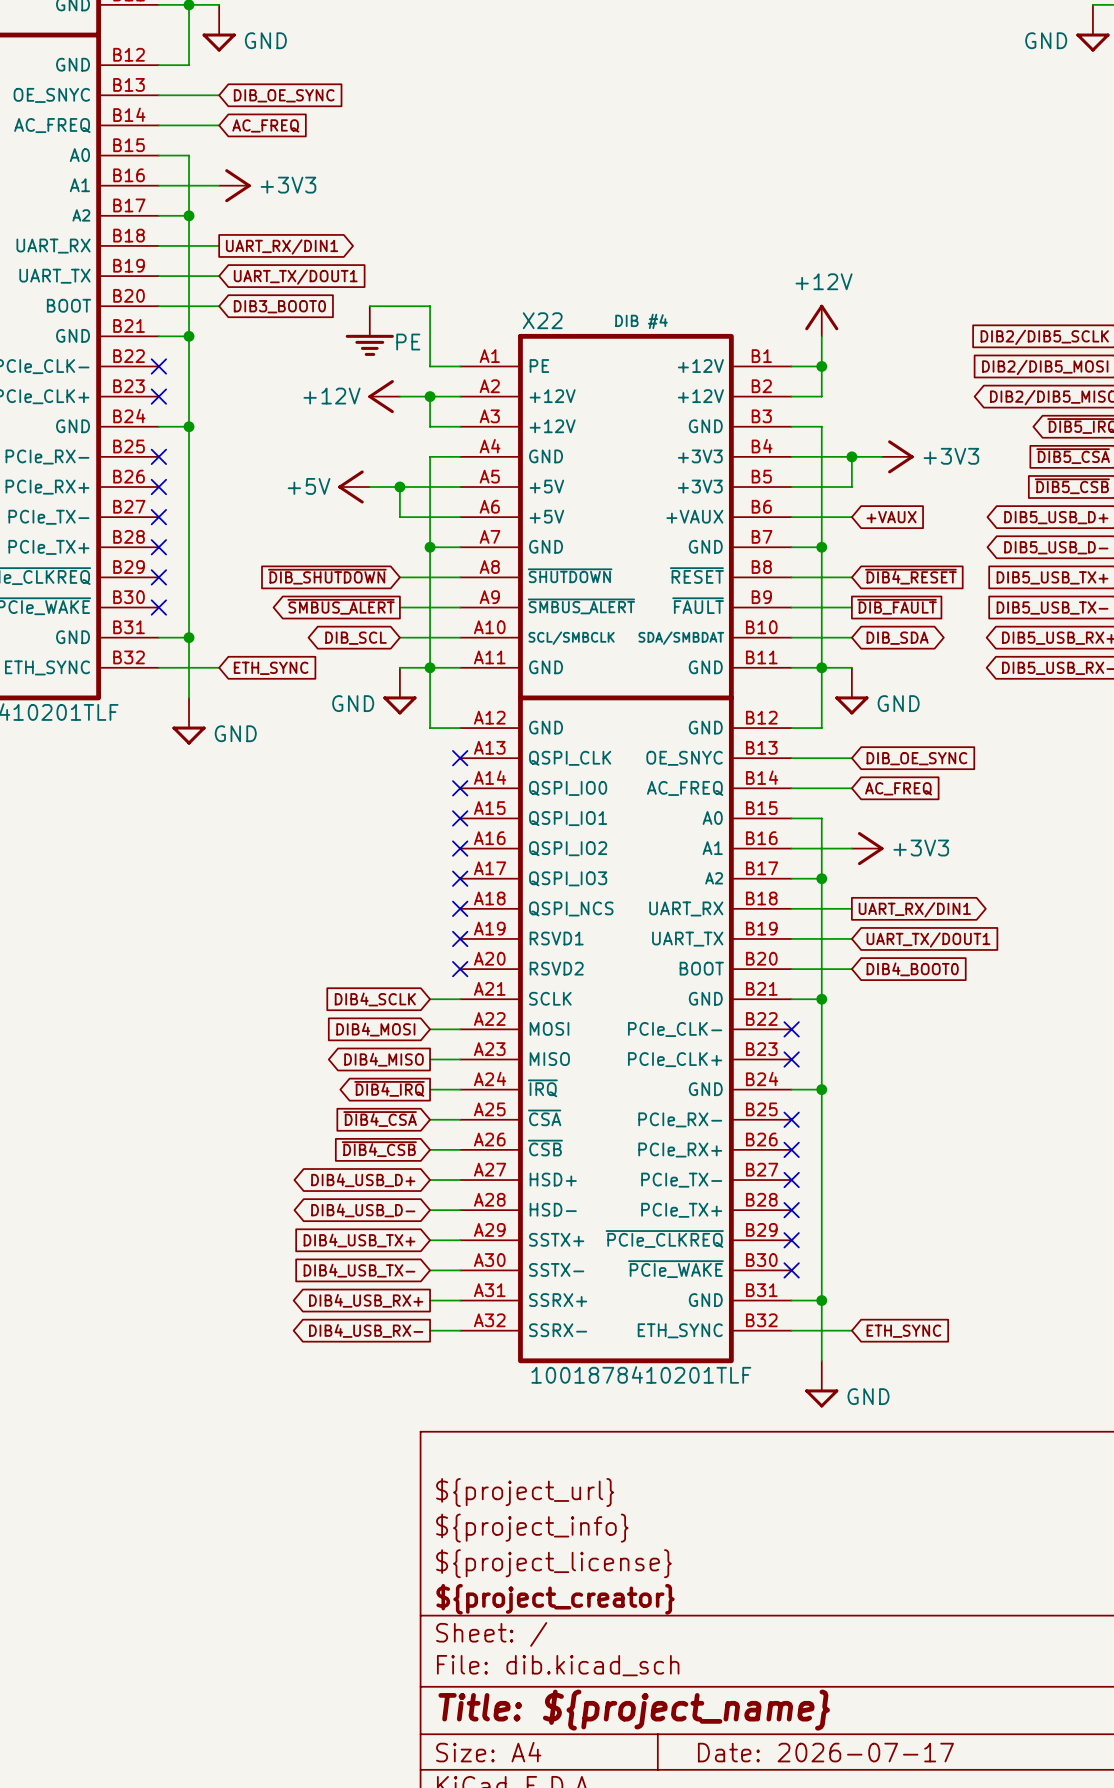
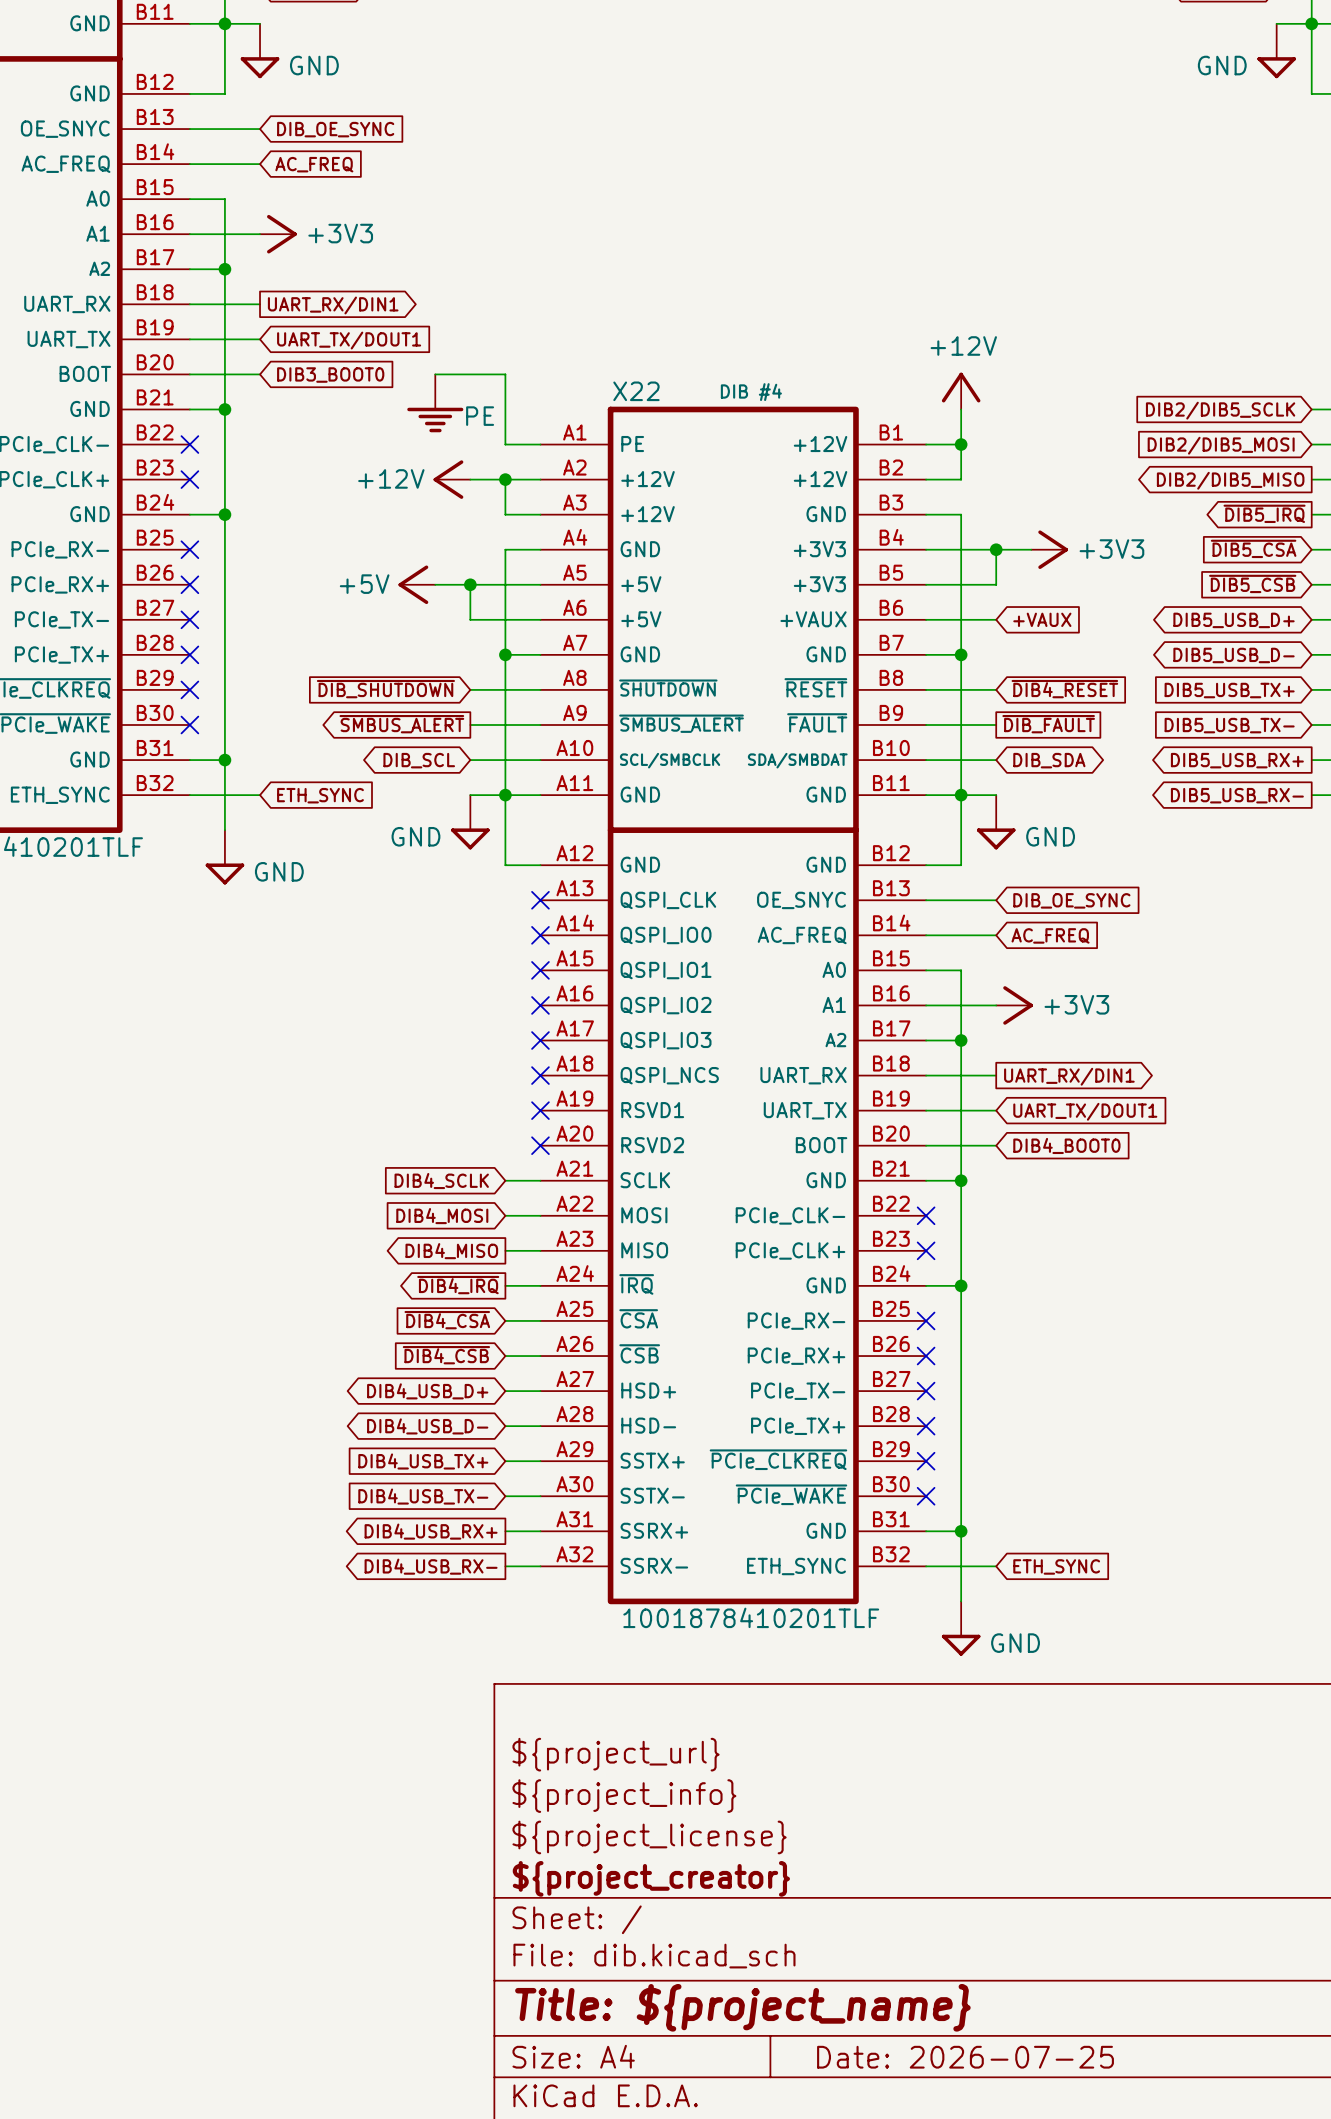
title block: Date: 2026-07-17 (825, 1752) -> Date: 2026-07-25 (965, 2057)

